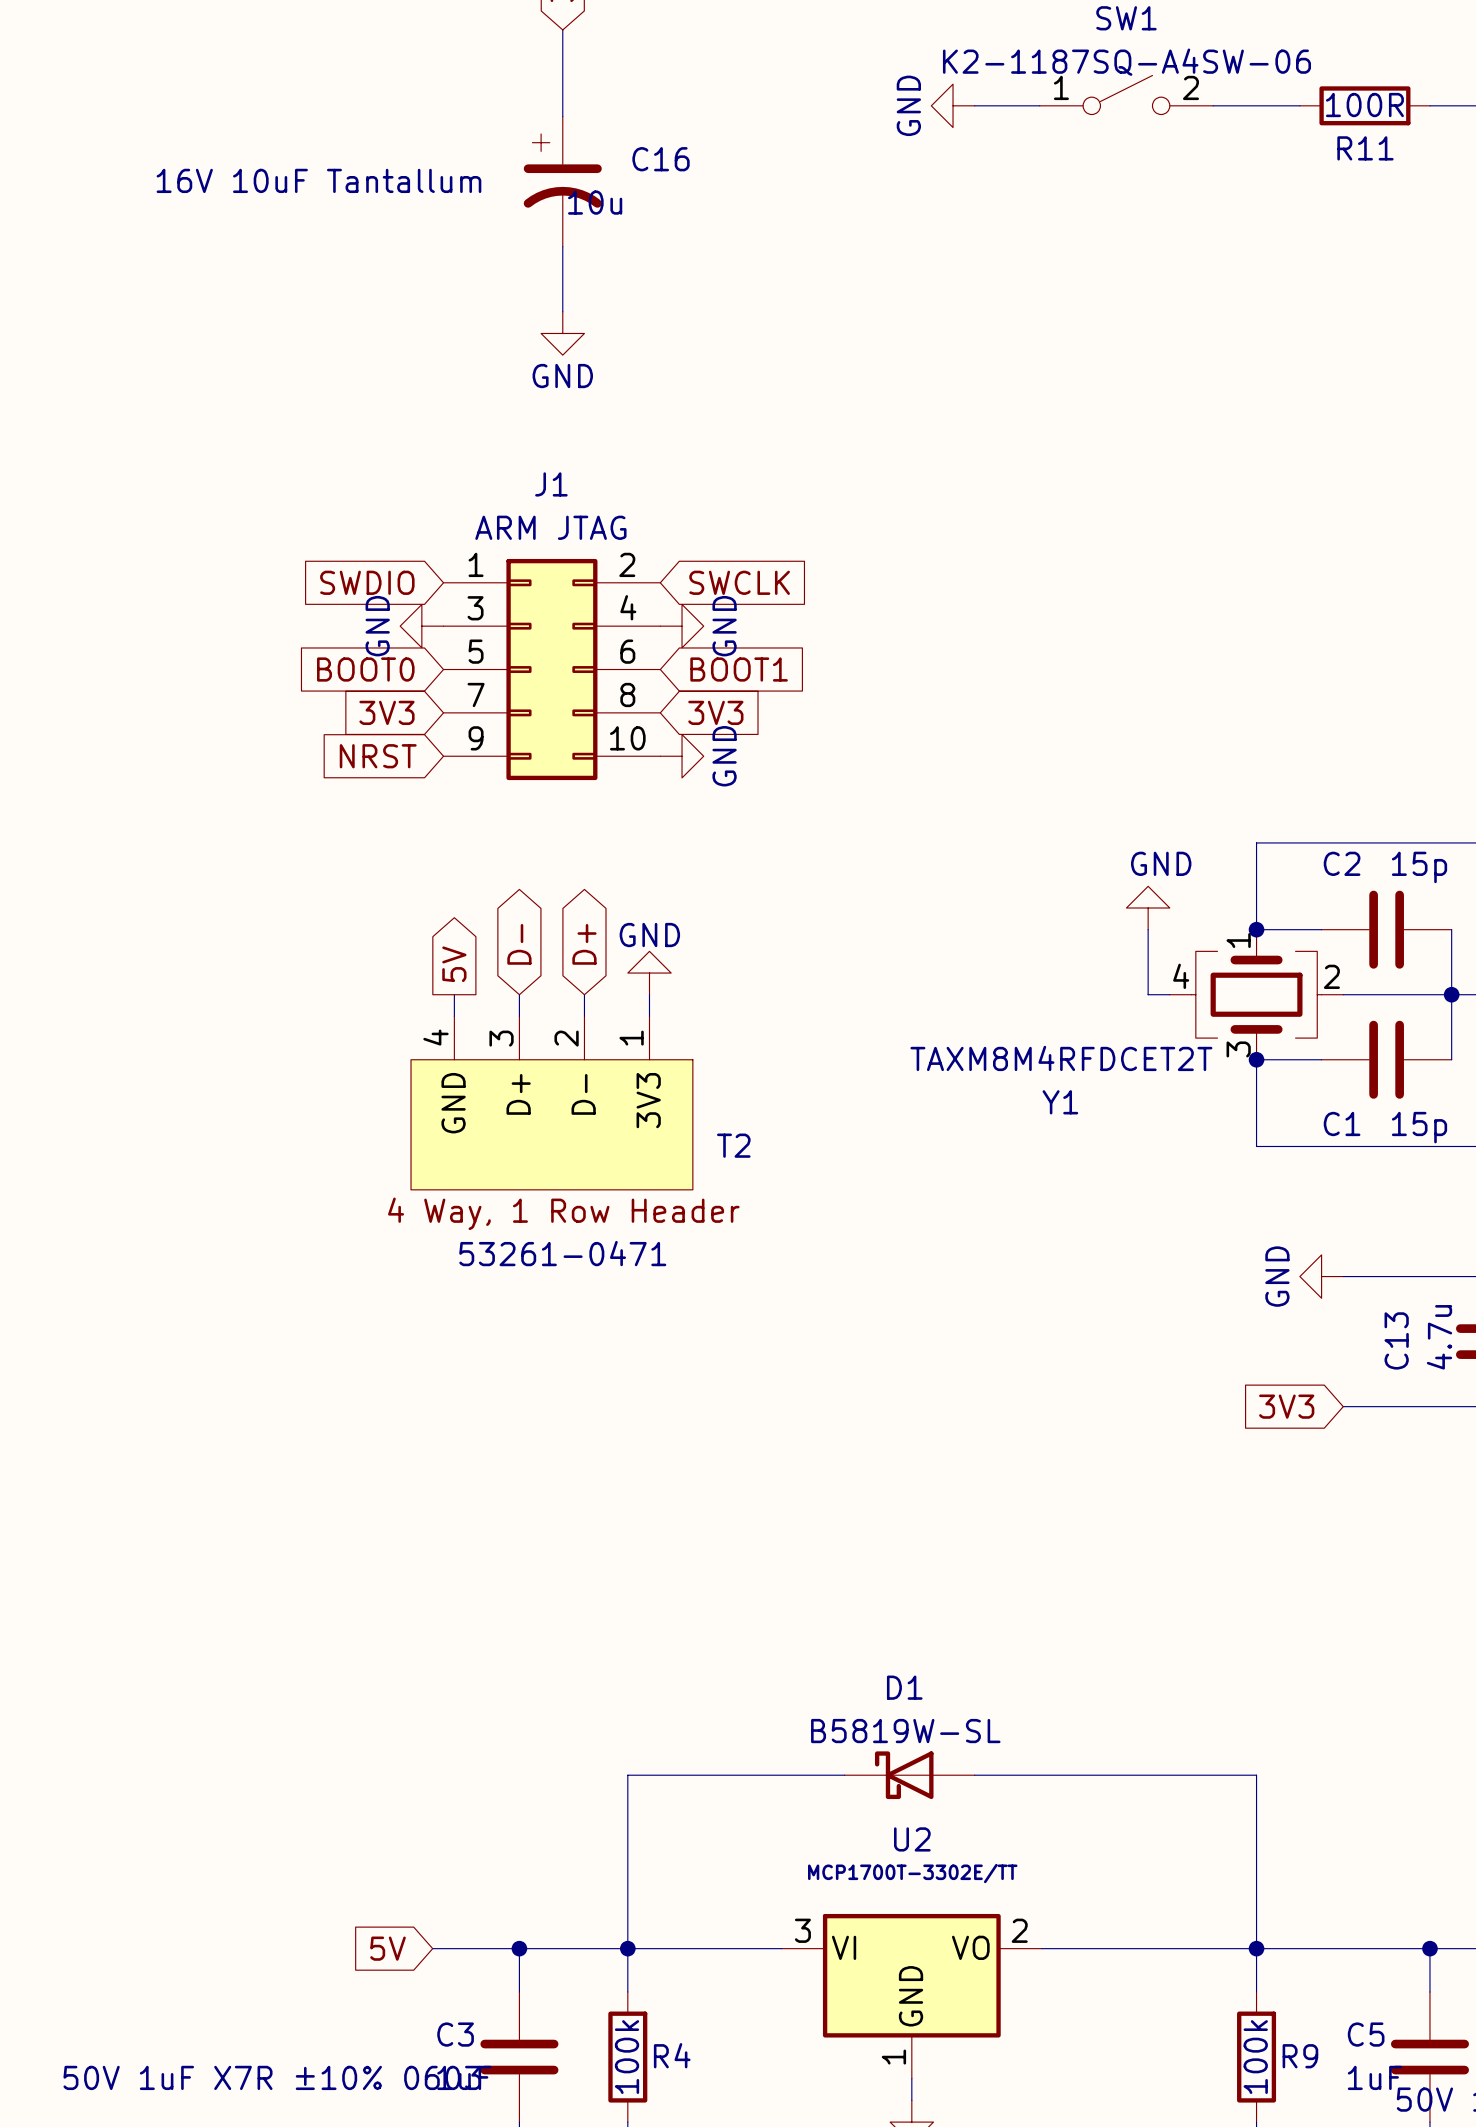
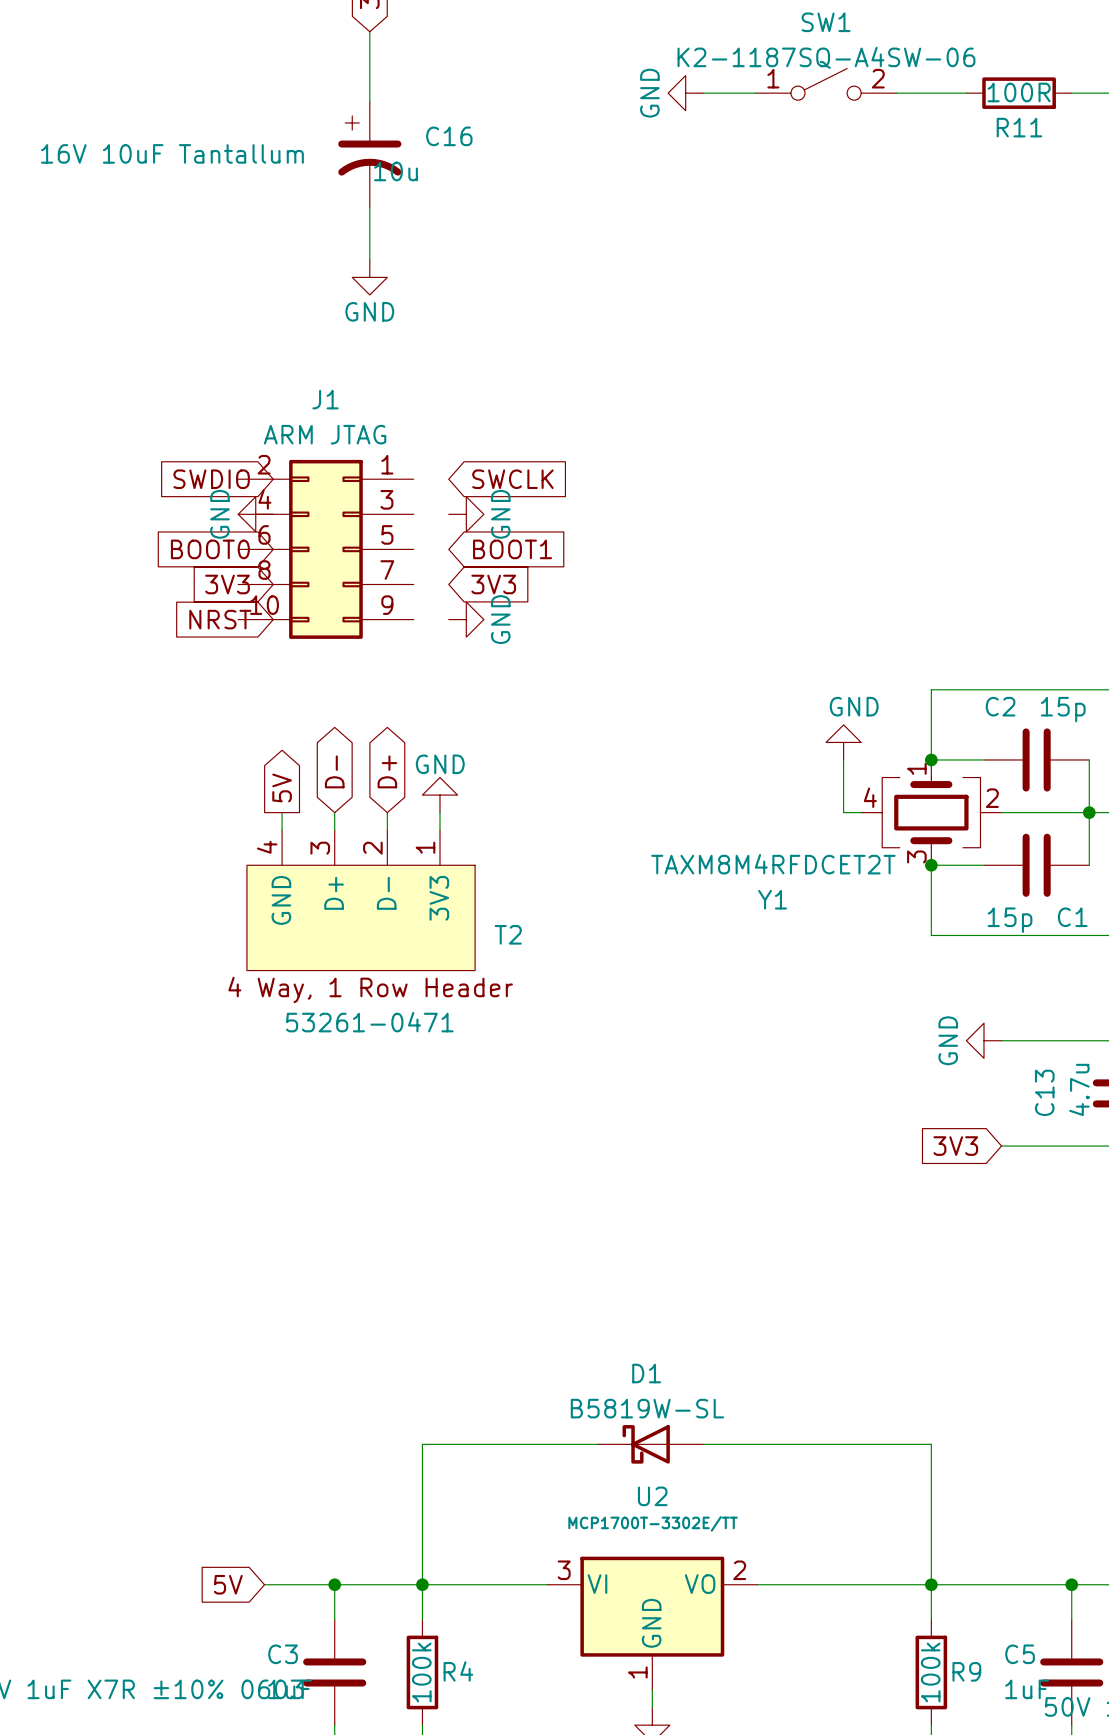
J1 flip: as is (551, 669) -> left-right (325, 549)
C1 name position: C1 (1342, 1123) -> C1 (1072, 917)
C1 value position: 15p (1419, 1127) -> 15p (1010, 920)

